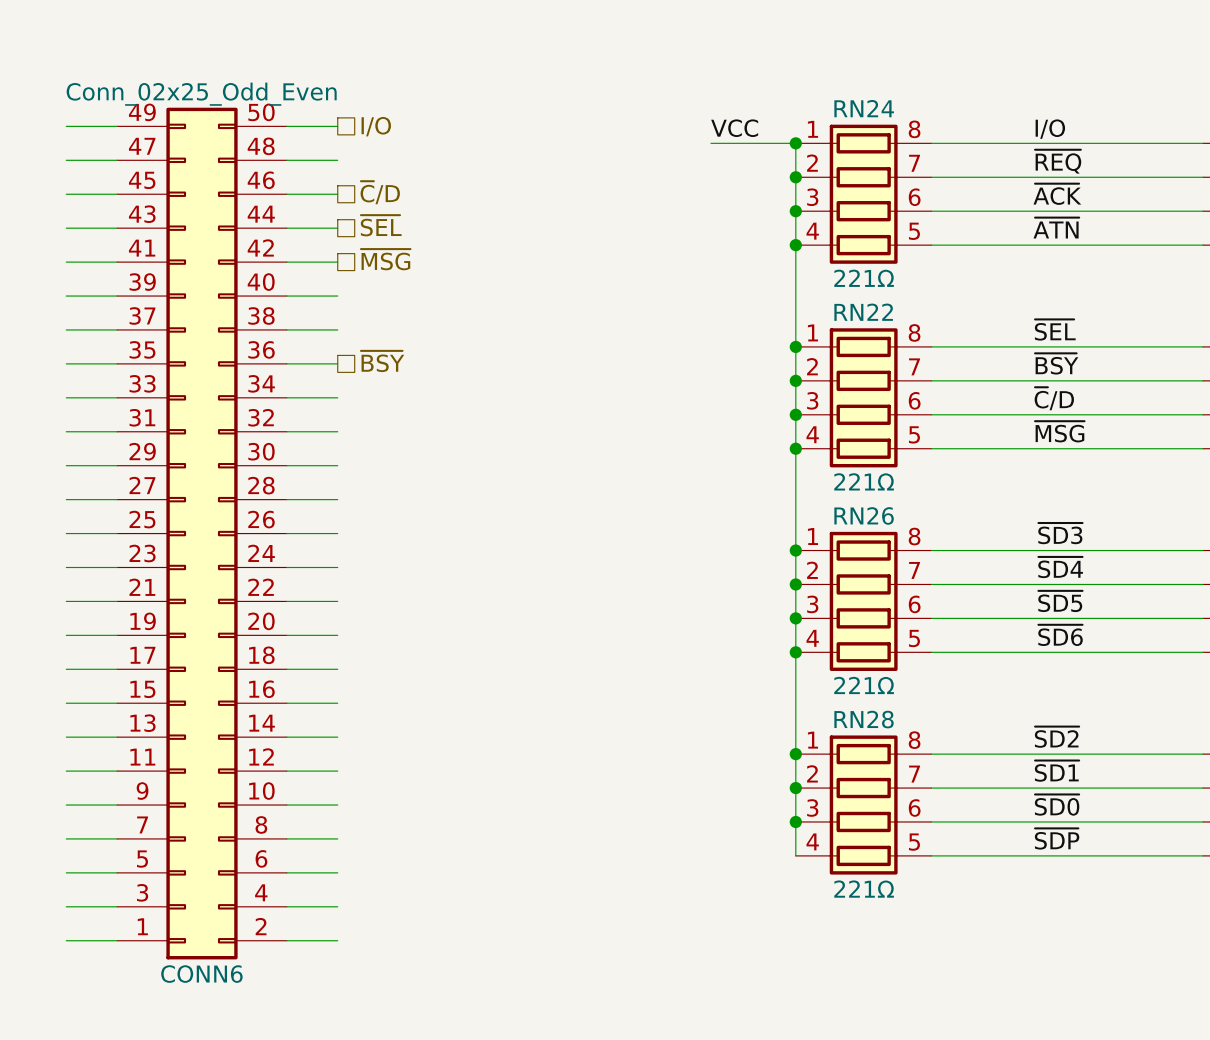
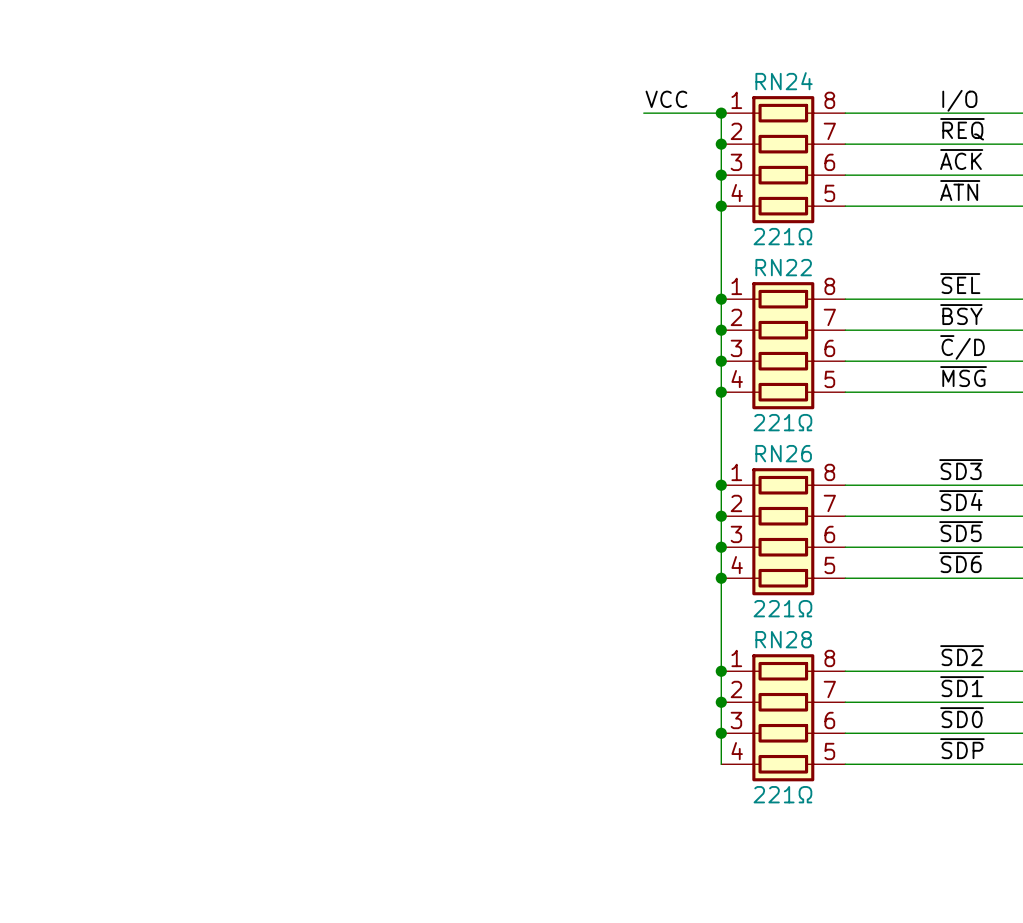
wire: (66, 126) (117, 126) -> none
wire: (286, 126) (337, 126) -> none
hierarchical label: I/O (376, 126) -> none
wire: (66, 160) (117, 160) -> none
wire: (286, 160) (337, 160) -> none
hierarchical label: ~{C}/D (380, 192) -> none
wire: (66, 194) (117, 194) -> none
wire: (286, 194) (337, 194) -> none
hierarchical label: ~{SEL} (381, 225) -> none
wire: (66, 228) (117, 228) -> none
wire: (286, 228) (337, 228) -> none
hierarchical label: ~{MSG} (385, 259) -> none
wire: (66, 262) (117, 262) -> none
wire: (286, 262) (337, 262) -> none
wire: (66, 296) (117, 296) -> none
wire: (286, 296) (337, 296) -> none
wire: (66, 329) (117, 329) -> none
wire: (286, 329) (337, 329) -> none
hierarchical label: ~{BSY} (382, 361) -> none
wire: (66, 363) (117, 363) -> none
wire: (286, 363) (337, 363) -> none
wire: (66, 397) (117, 397) -> none
wire: (286, 397) (337, 397) -> none
wire: (66, 431) (117, 431) -> none
wire: (286, 431) (337, 431) -> none
wire: (66, 465) (117, 465) -> none
wire: (286, 465) (337, 465) -> none
wire: (66, 499) (117, 499) -> none
wire: (286, 499) (337, 499) -> none
wire: (66, 533) (117, 533) -> none
CONN6: Conn_02x25_Odd_Even (202, 533) -> none
wire: (286, 533) (337, 533) -> none
wire: (66, 567) (117, 567) -> none
wire: (286, 567) (337, 567) -> none
wire: (66, 601) (117, 601) -> none
wire: (286, 601) (337, 601) -> none
wire: (66, 635) (117, 635) -> none
wire: (286, 635) (337, 635) -> none
wire: (66, 669) (117, 669) -> none
wire: (286, 669) (337, 669) -> none
wire: (66, 703) (117, 703) -> none
wire: (286, 703) (337, 703) -> none
wire: (66, 737) (117, 737) -> none
wire: (286, 737) (337, 737) -> none
wire: (66, 771) (117, 771) -> none
wire: (286, 771) (337, 771) -> none
wire: (66, 805) (117, 805) -> none
wire: (286, 805) (337, 805) -> none
wire: (66, 838) (117, 838) -> none
wire: (286, 838) (337, 838) -> none
wire: (66, 872) (117, 872) -> none
wire: (286, 872) (337, 872) -> none
wire: (66, 906) (117, 906) -> none
wire: (286, 906) (337, 906) -> none
wire: (66, 940) (117, 940) -> none
wire: (286, 940) (337, 940) -> none

